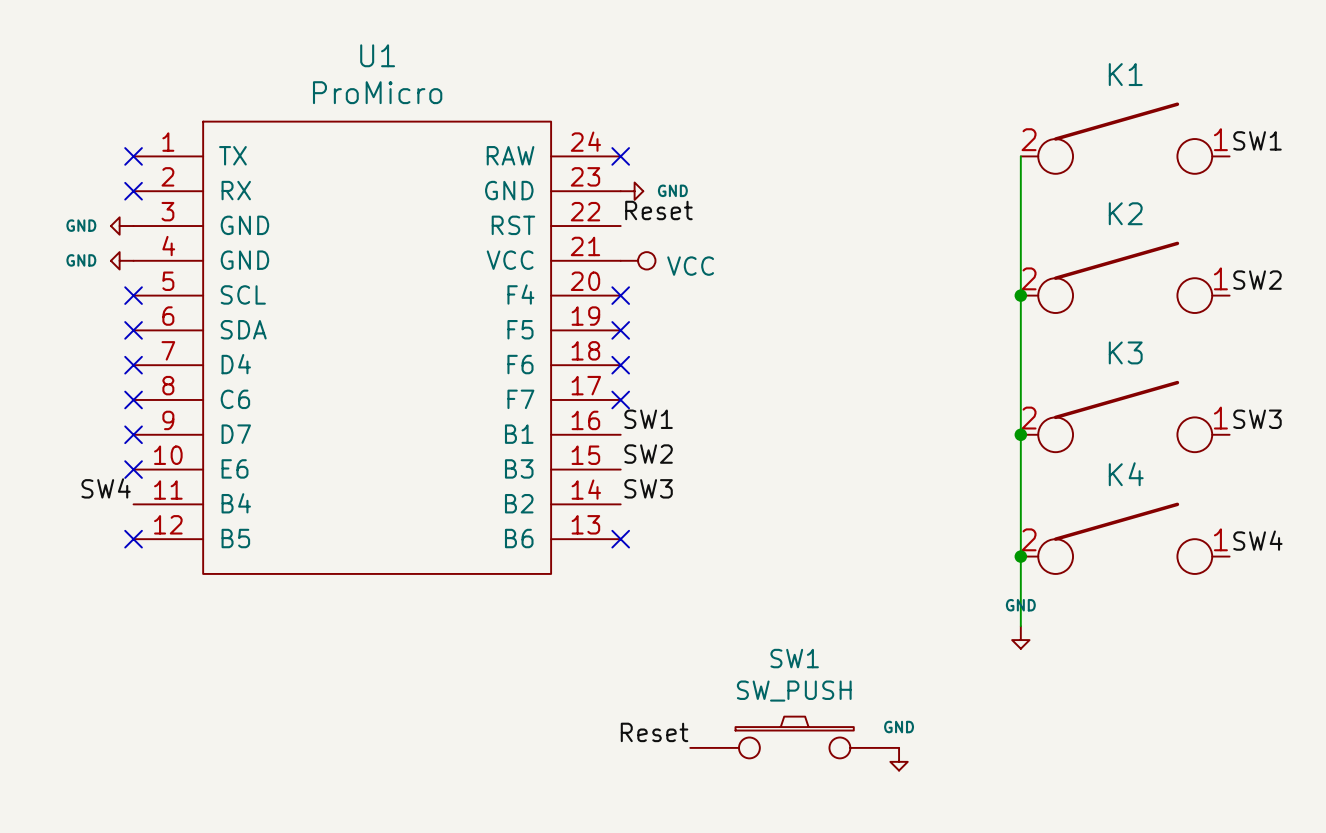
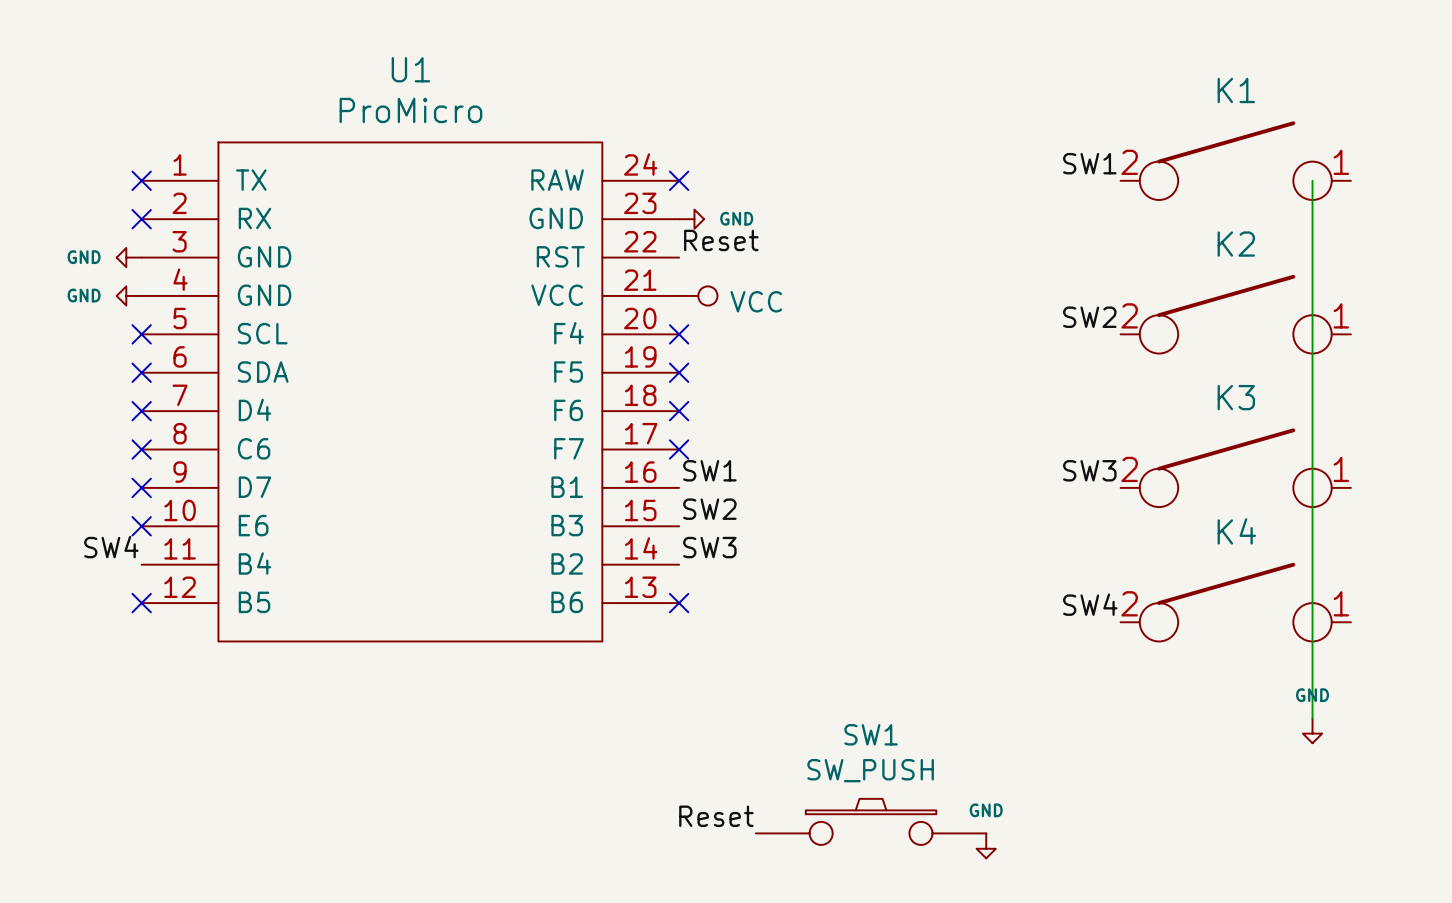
label position: SW1 (1257, 140) -> SW1 (1089, 163)
wire: (1020, 156) (1020, 626) -> none
wire: none -> (1312, 180) (1312, 718)
label position: SW2 (1257, 280) -> SW2 (1089, 317)
junction: (1020, 295) -> none
label position: SW3 (1257, 419) -> SW3 (1089, 470)
junction: (1020, 434) -> none
label position: SW4 (1257, 540) -> SW4 (1090, 604)
junction: (1020, 556) -> none
power symbol position: GND (1020, 637) -> GND (1312, 730)

